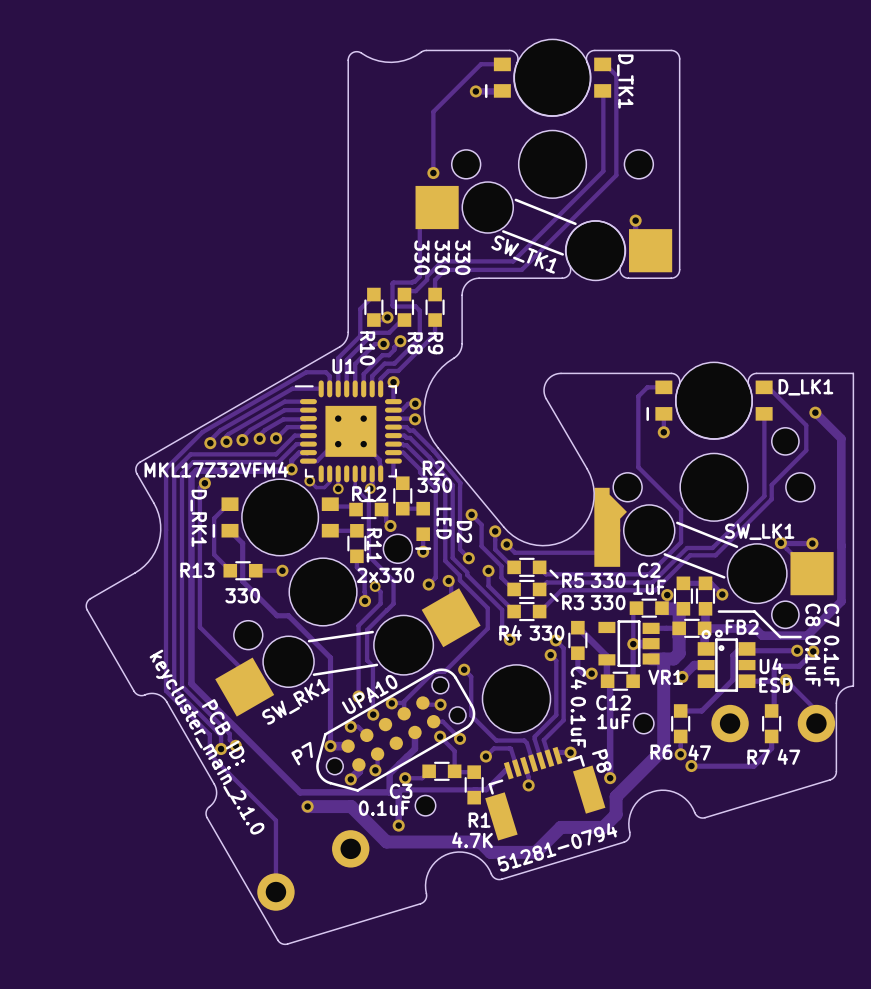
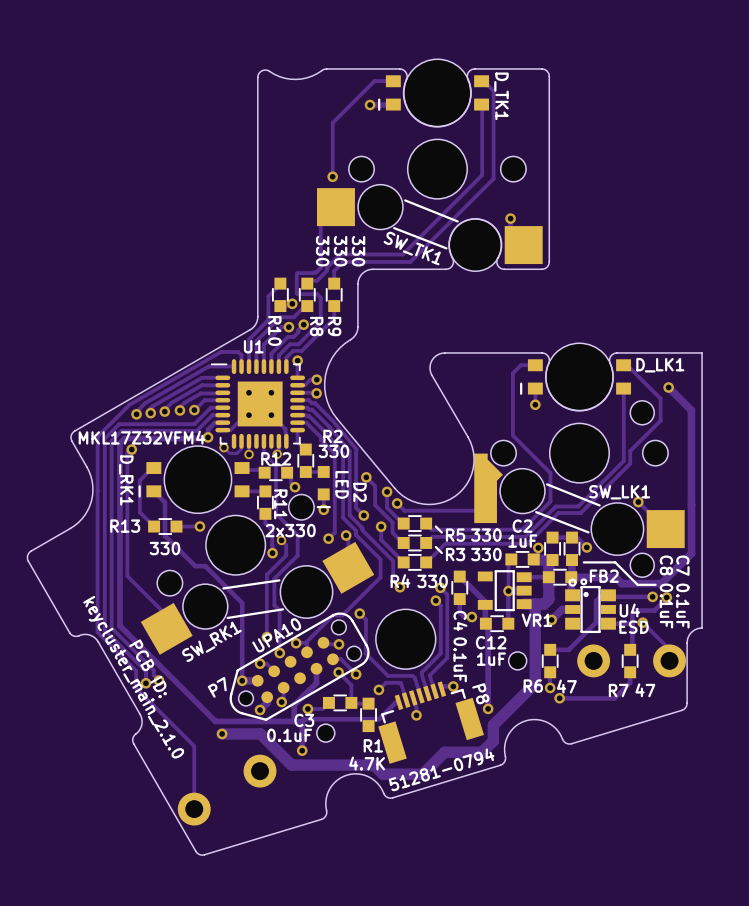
track: (812, 543) (781, 543) -> none
via: (812, 543) -> none

